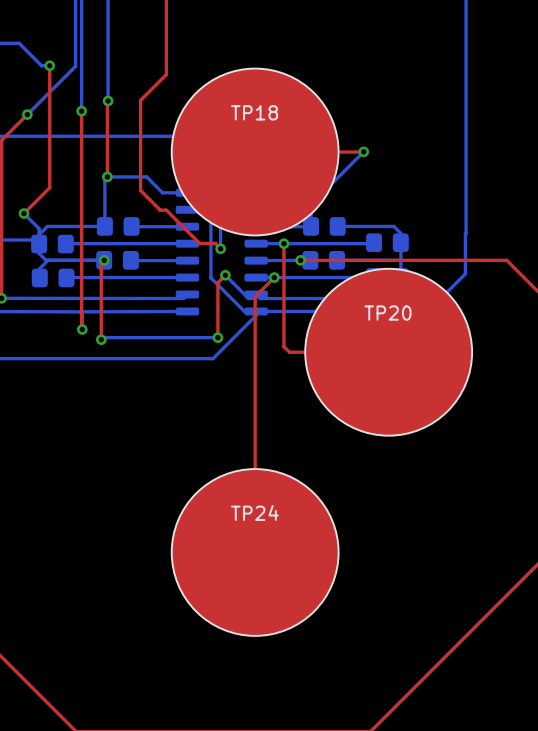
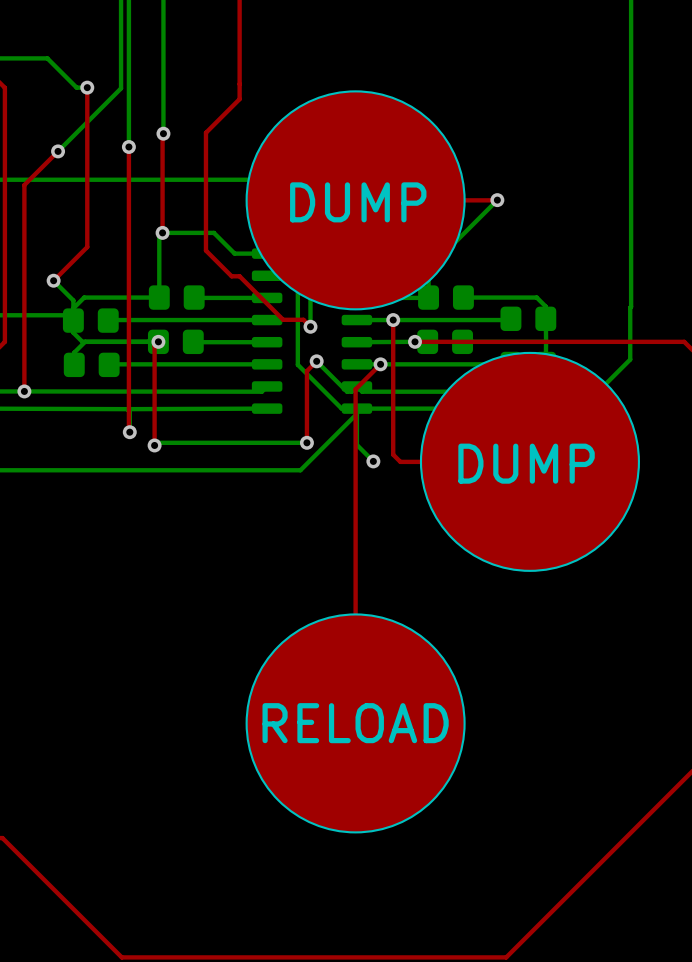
TP18 name: TP18 (254, 112) -> none
text: none -> DUMP (358, 202)
TP20 name: TP20 (388, 313) -> none
bottom track: none -> (356, 413) (356, 444) (373, 461)
via: none -> (373, 461)
text: none -> DUMP (526, 463)
TP24 name: TP24 (254, 512) -> none
text: none -> RELOAD (355, 723)

